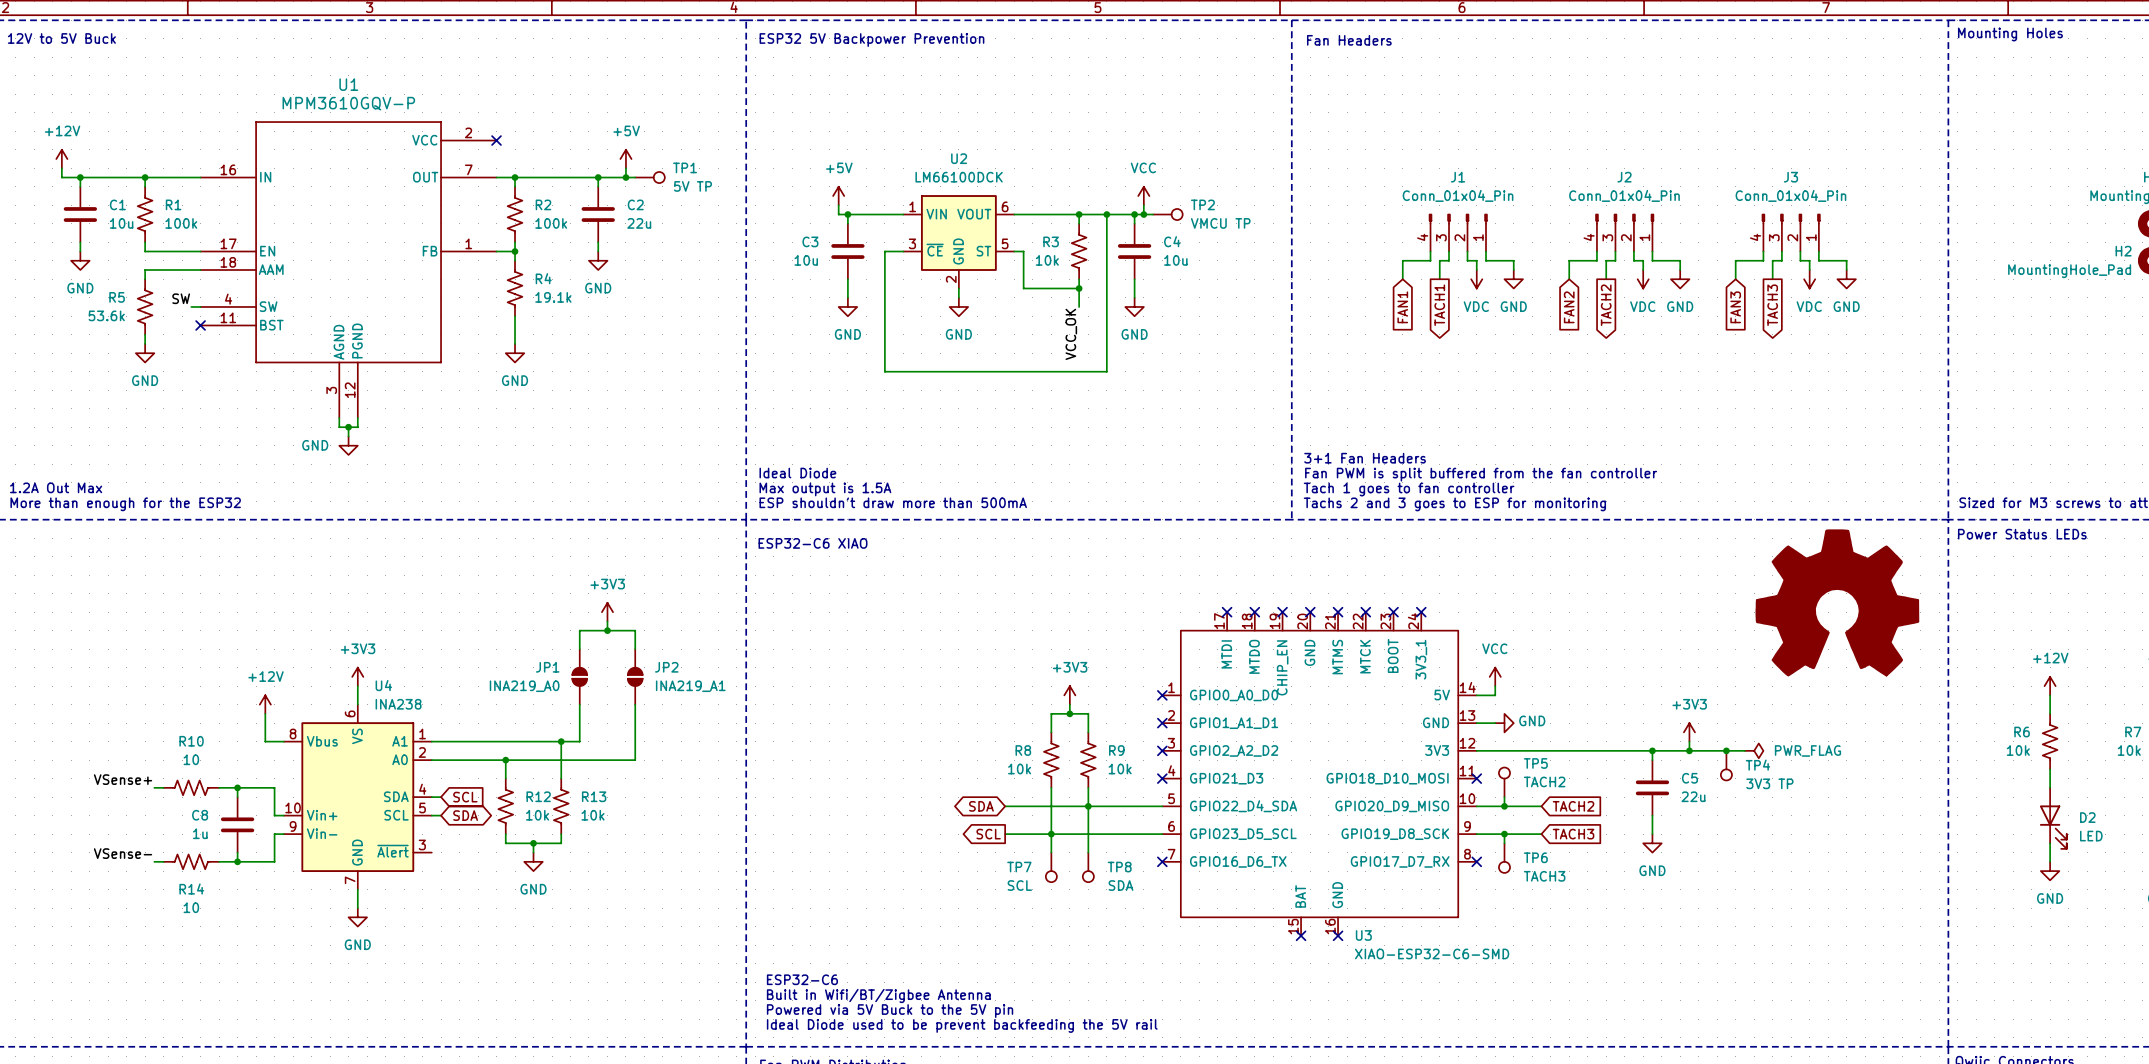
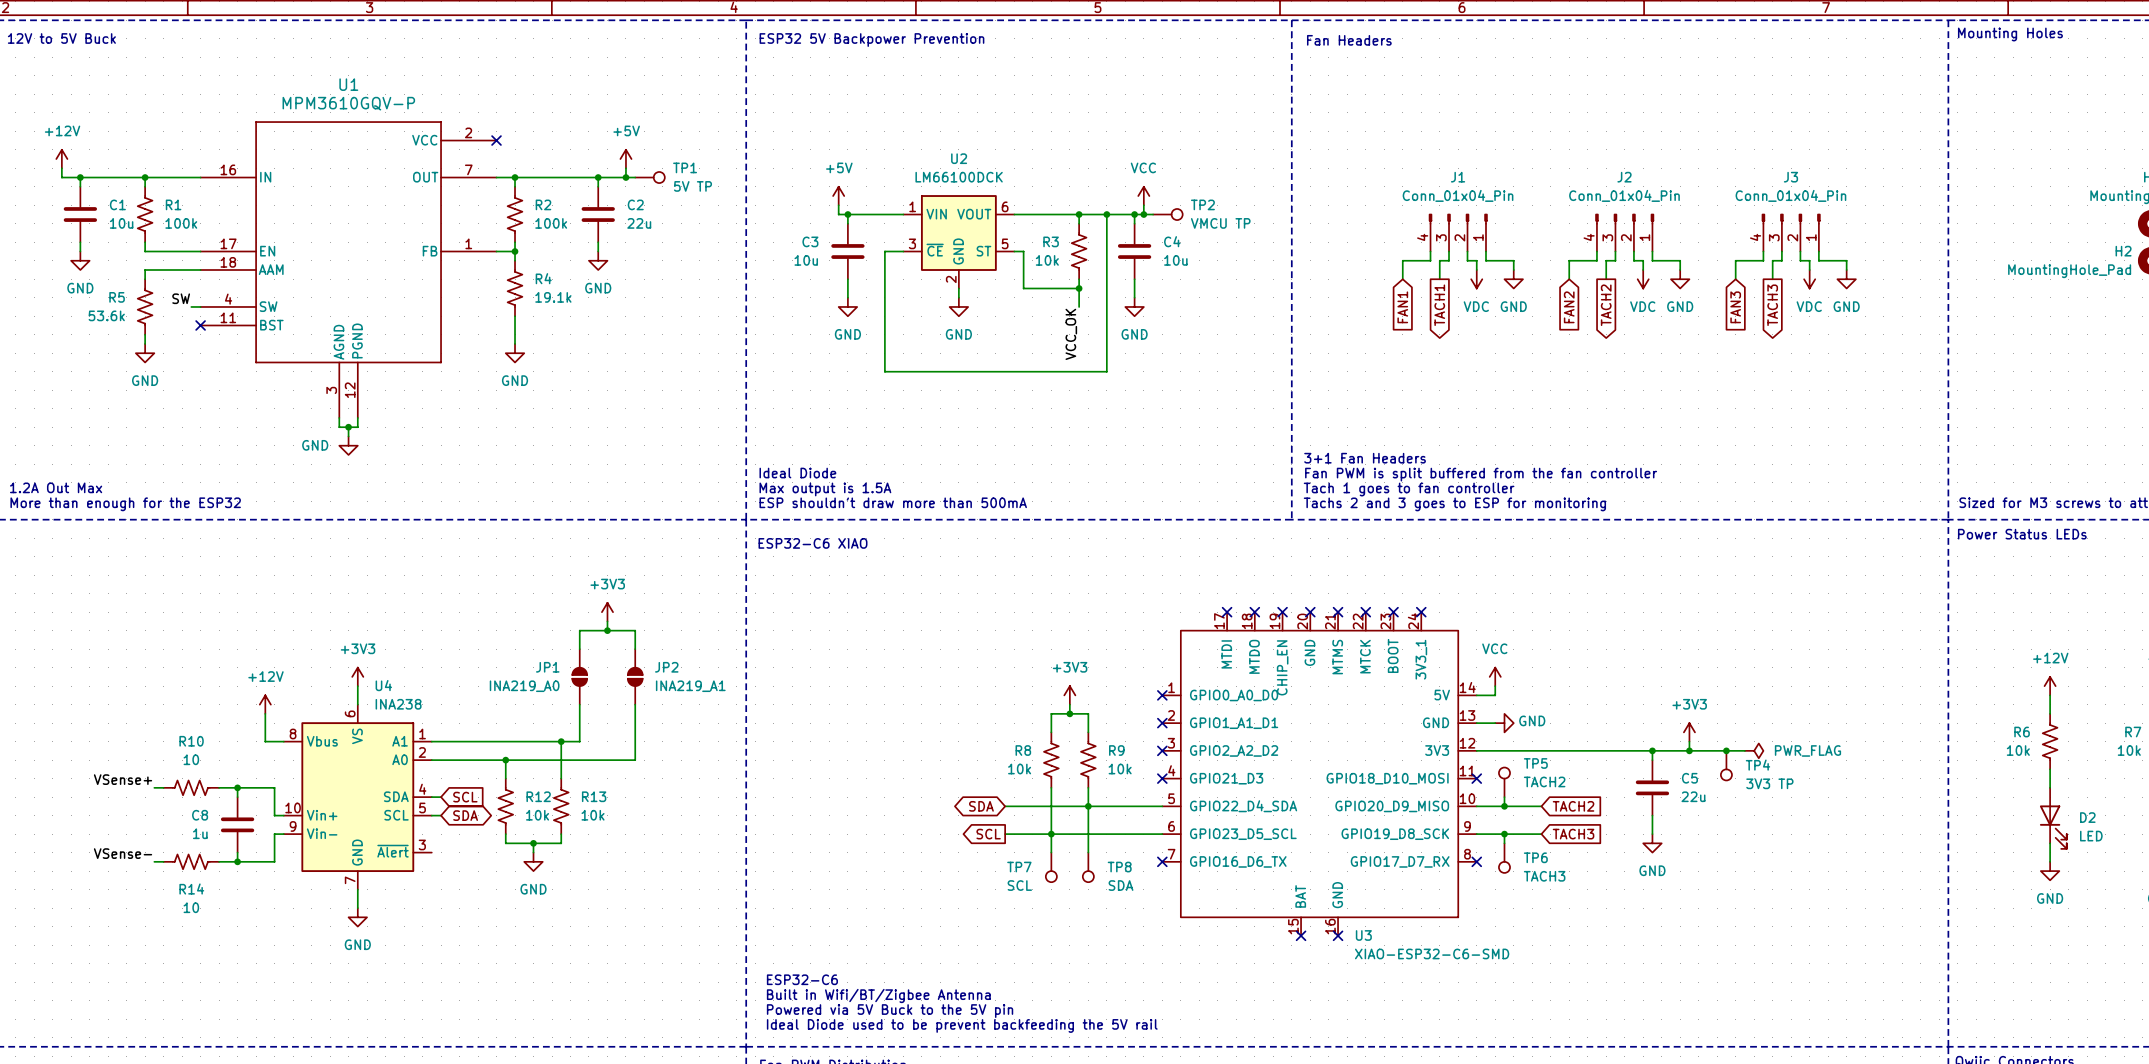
power symbol: (1837, 602) -> none

